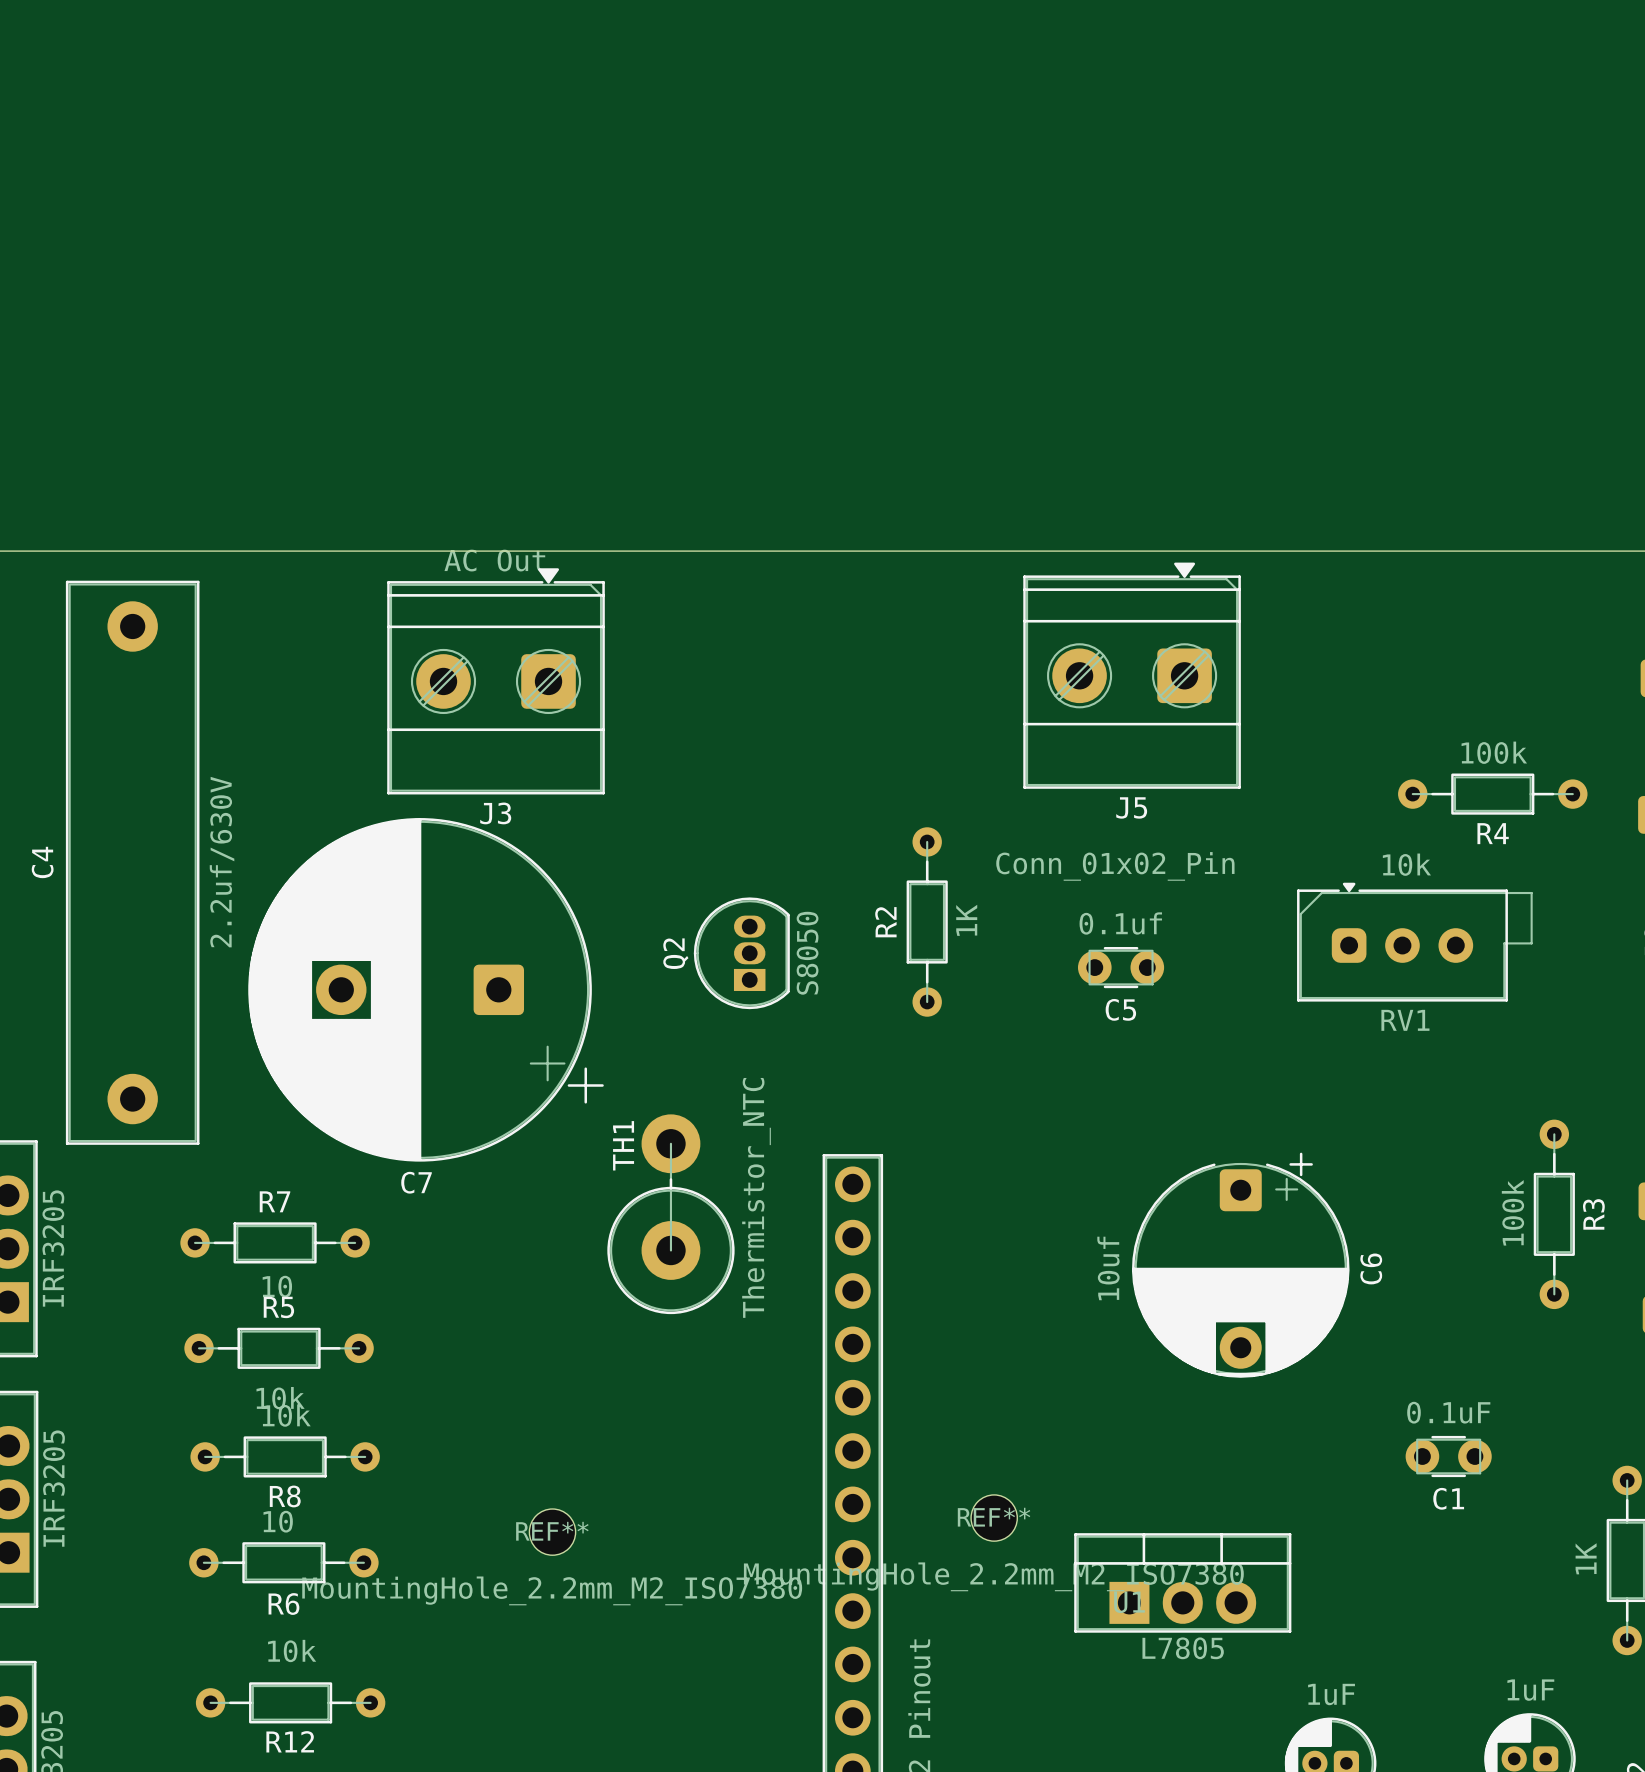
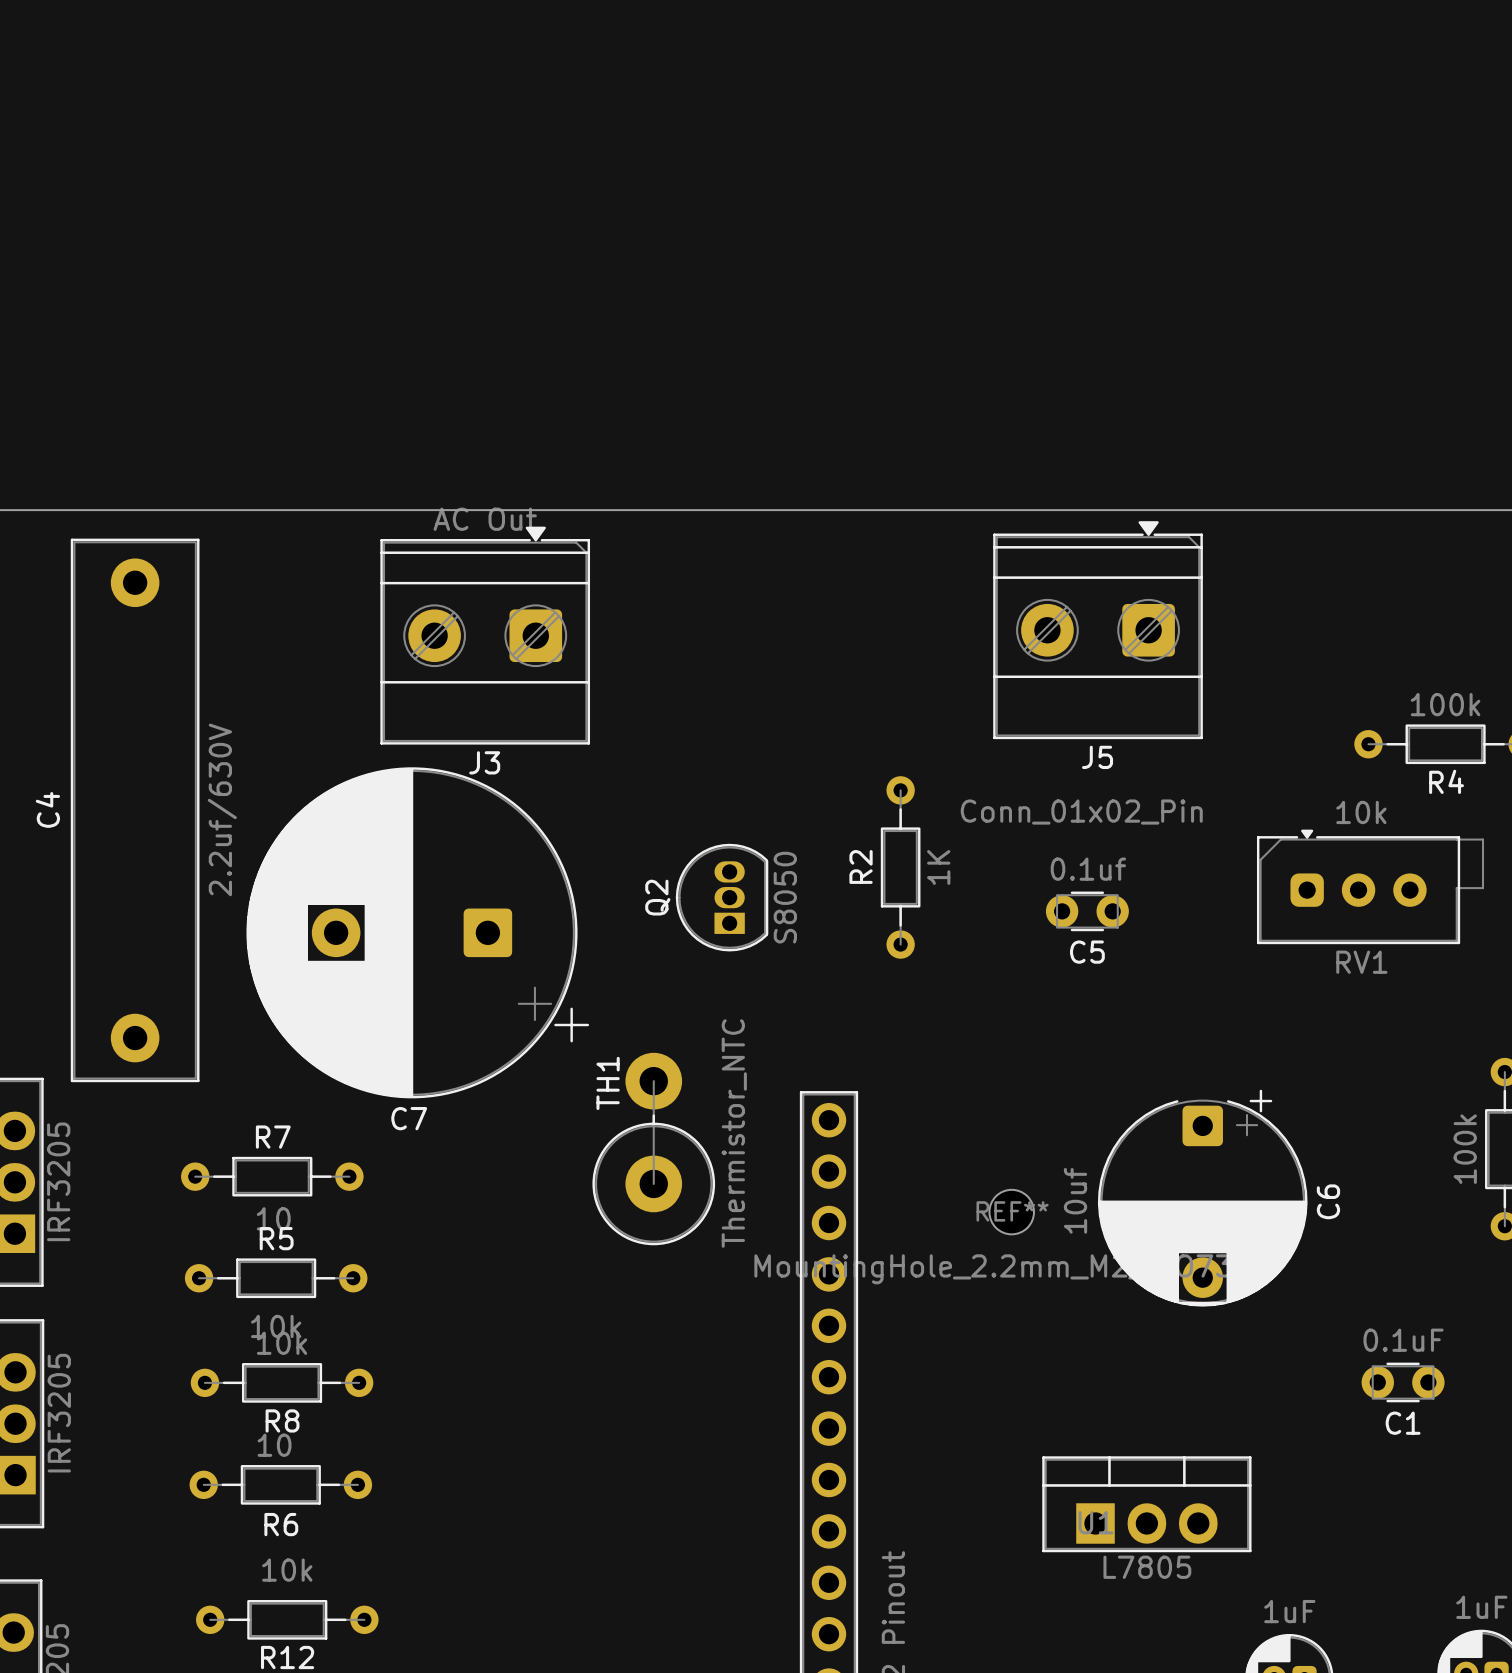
REF** position: (994, 1518) -> (1011, 1212)
REF**: MountingHole_2.2mm_M2_ISO7380 (552, 1532) -> none

